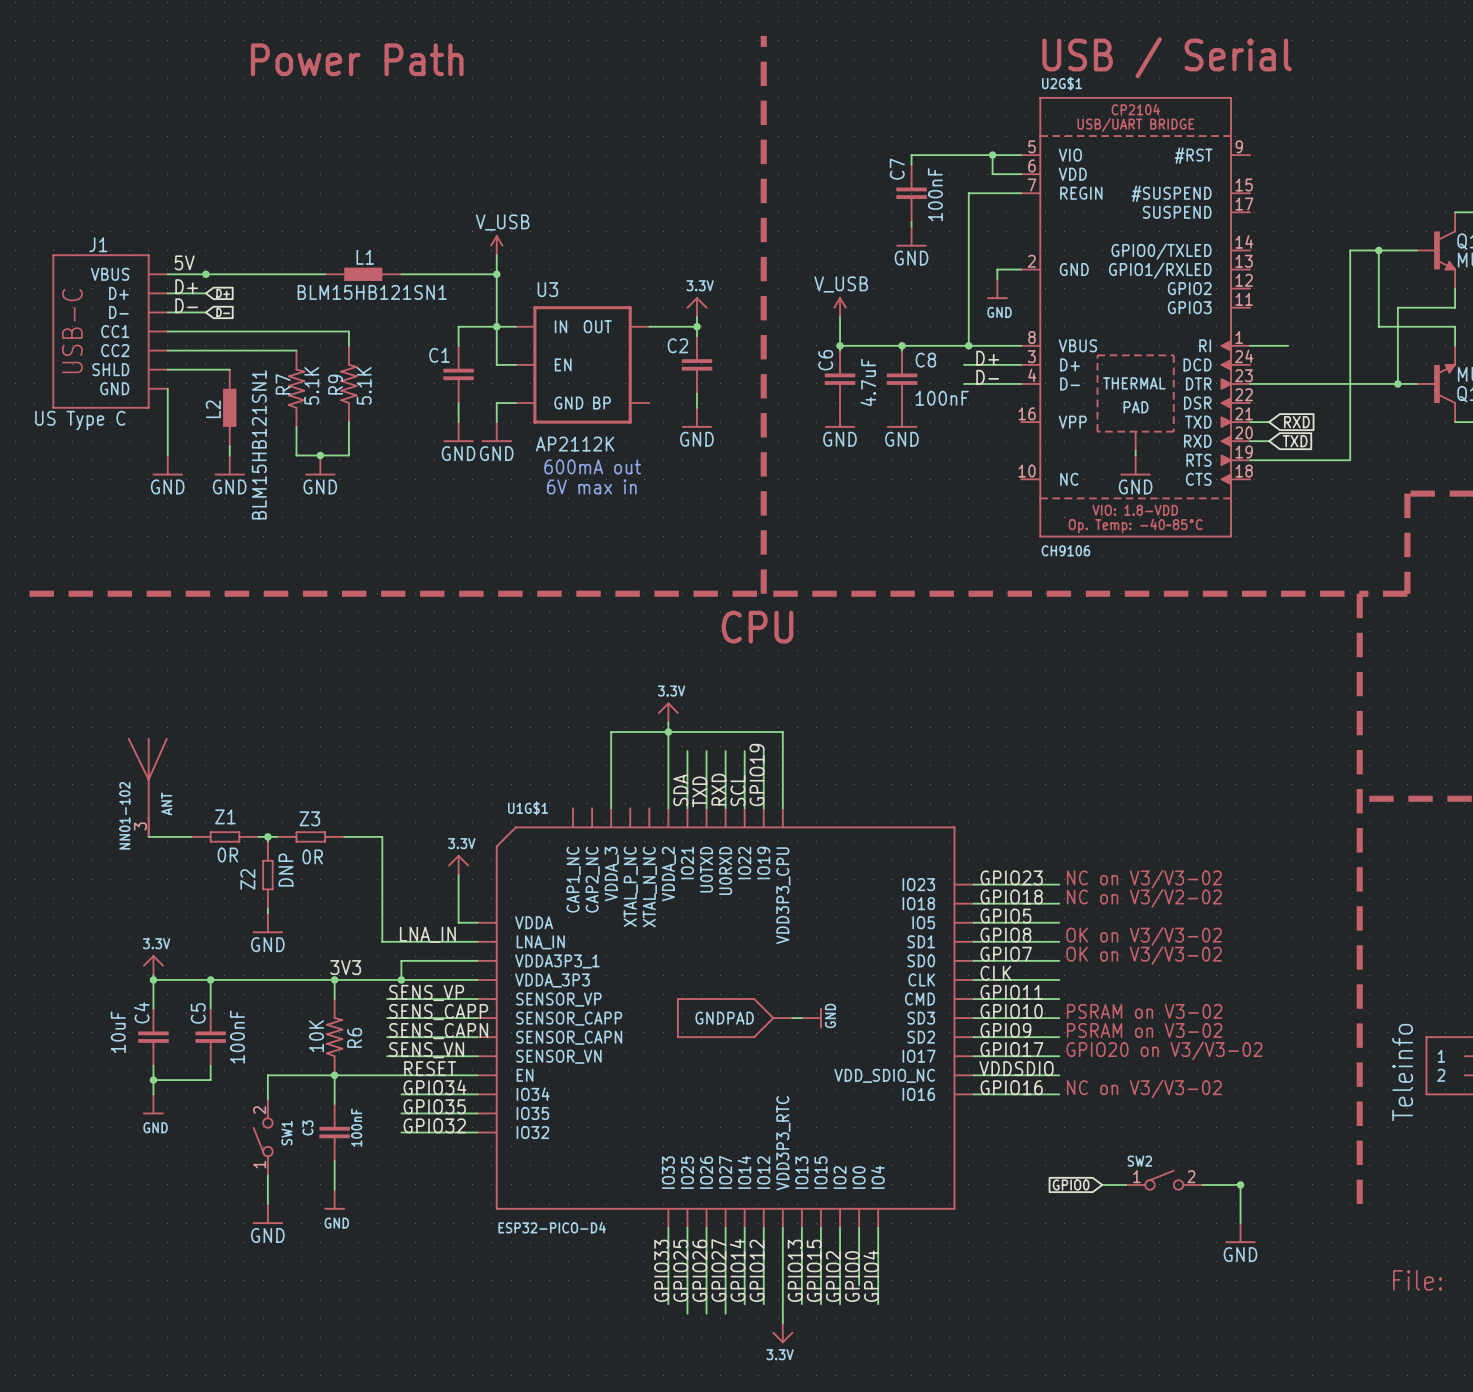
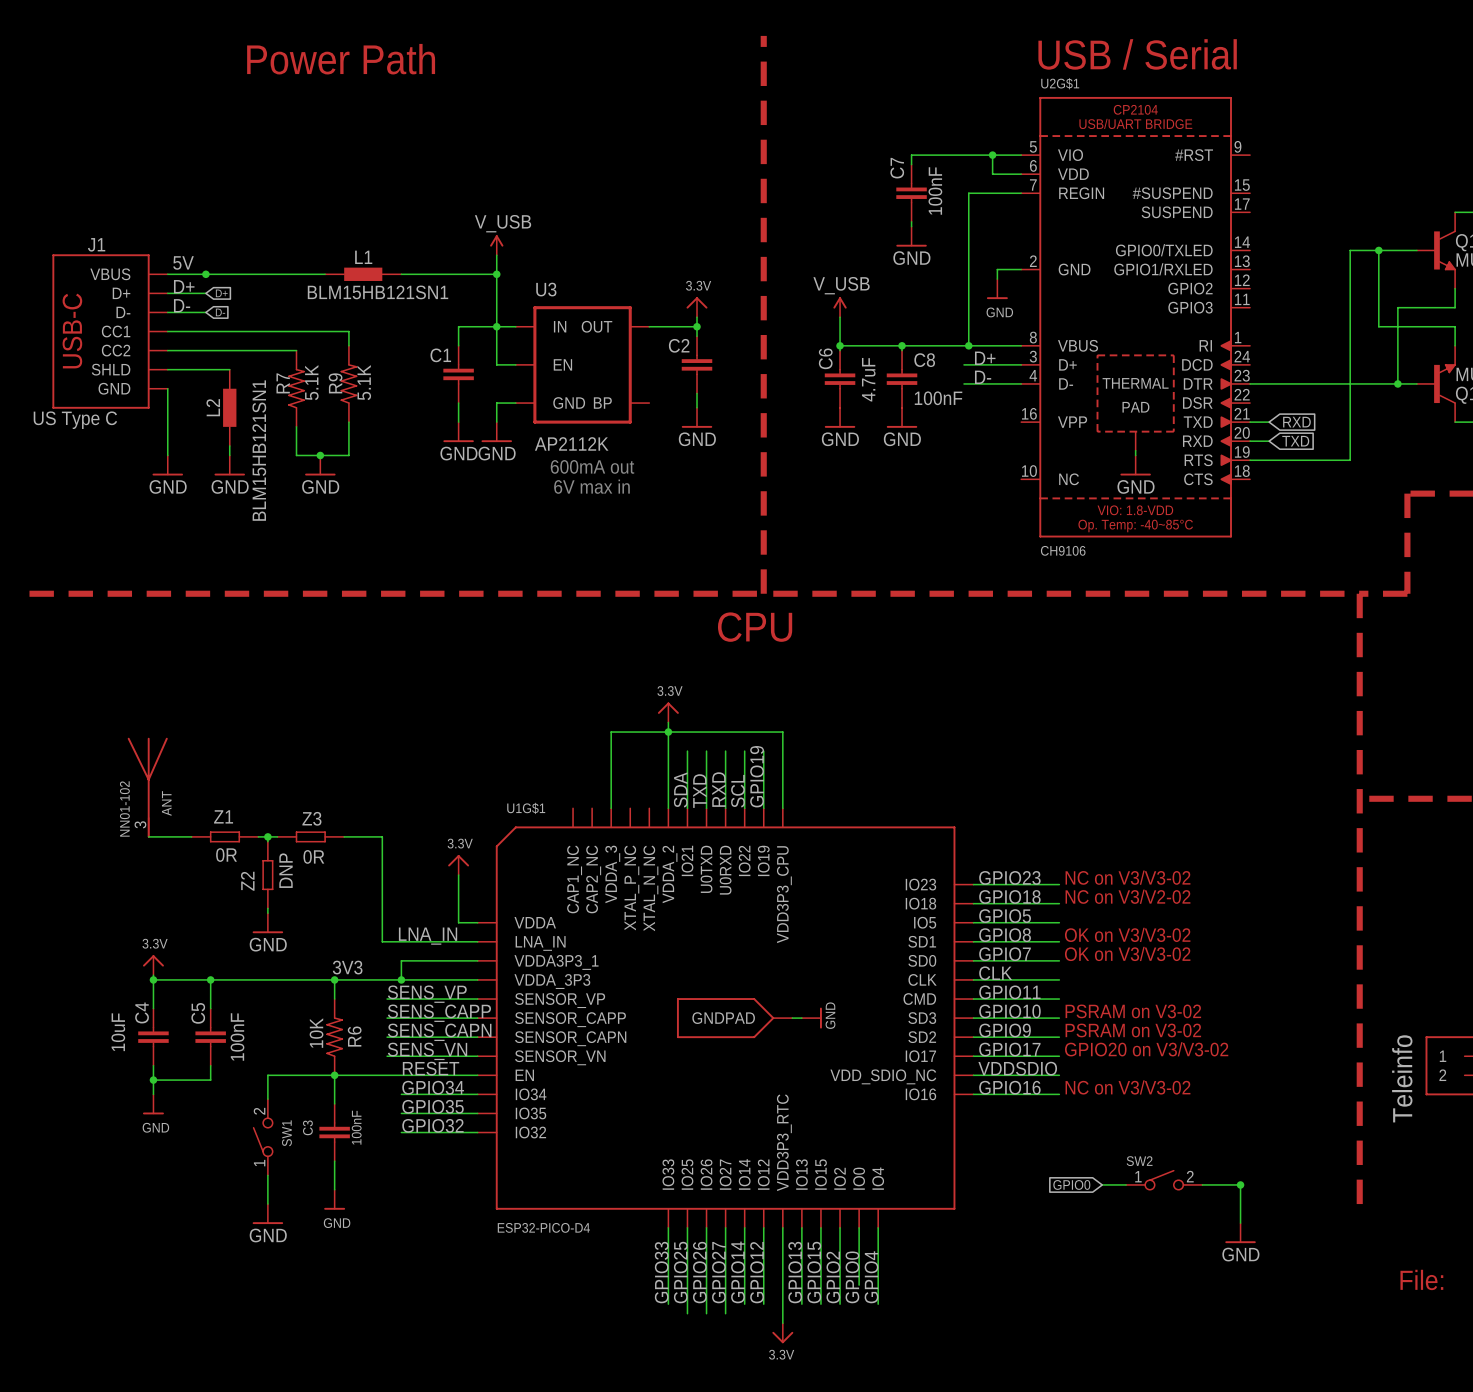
wire: (1250, 345) (1288, 345) -> none

